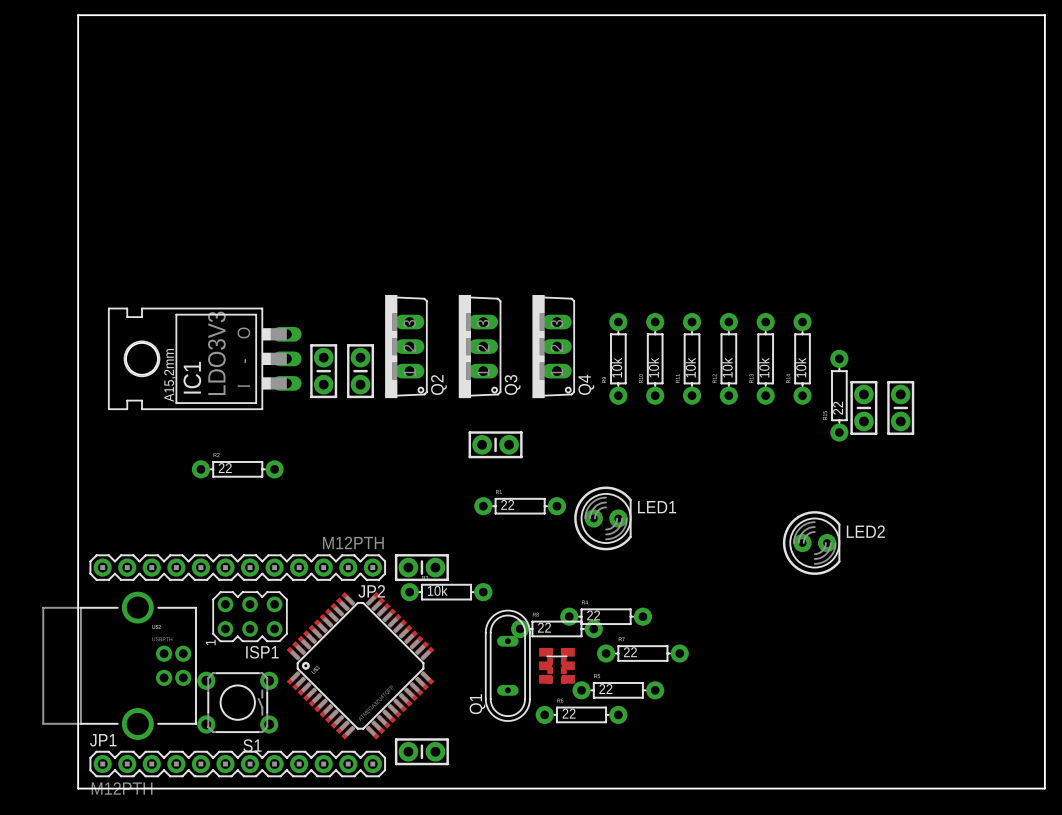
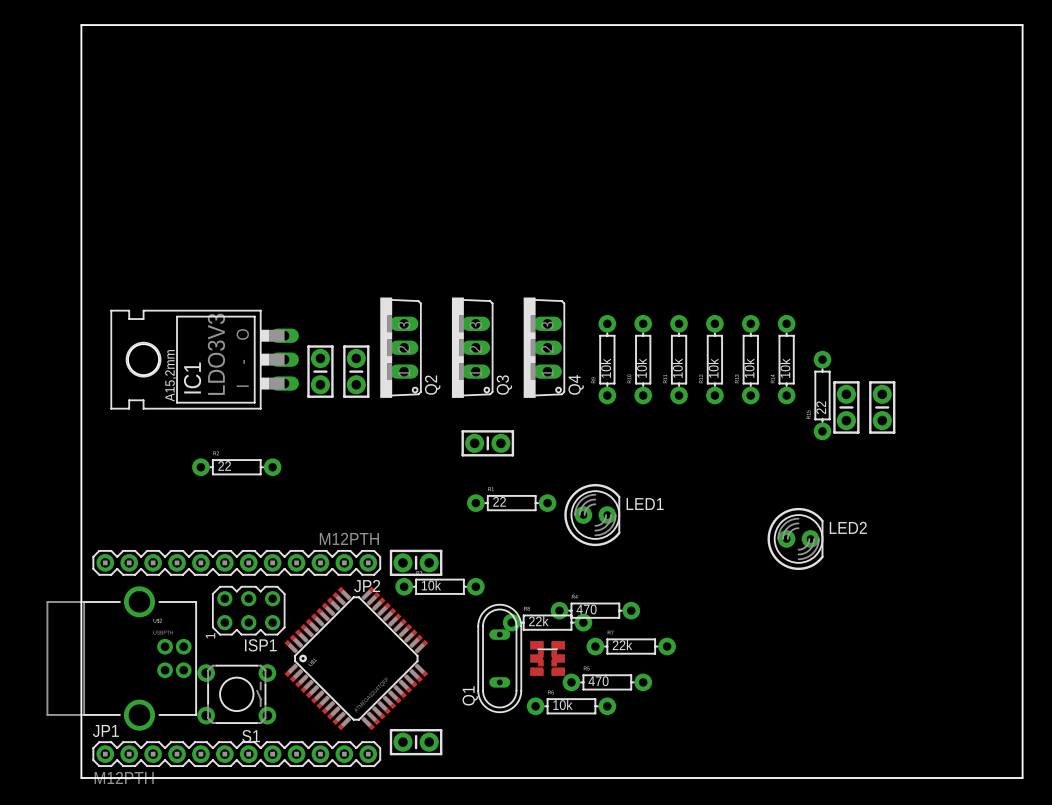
part value: 22 (593, 615) -> 470 (586, 609)
part value: 22 (544, 627) -> 22k (538, 621)
part value: 22 (630, 652) -> 22k (622, 645)
part value: 22 (605, 689) -> 470 (598, 681)
part value: 22 (569, 713) -> 10k (562, 704)

